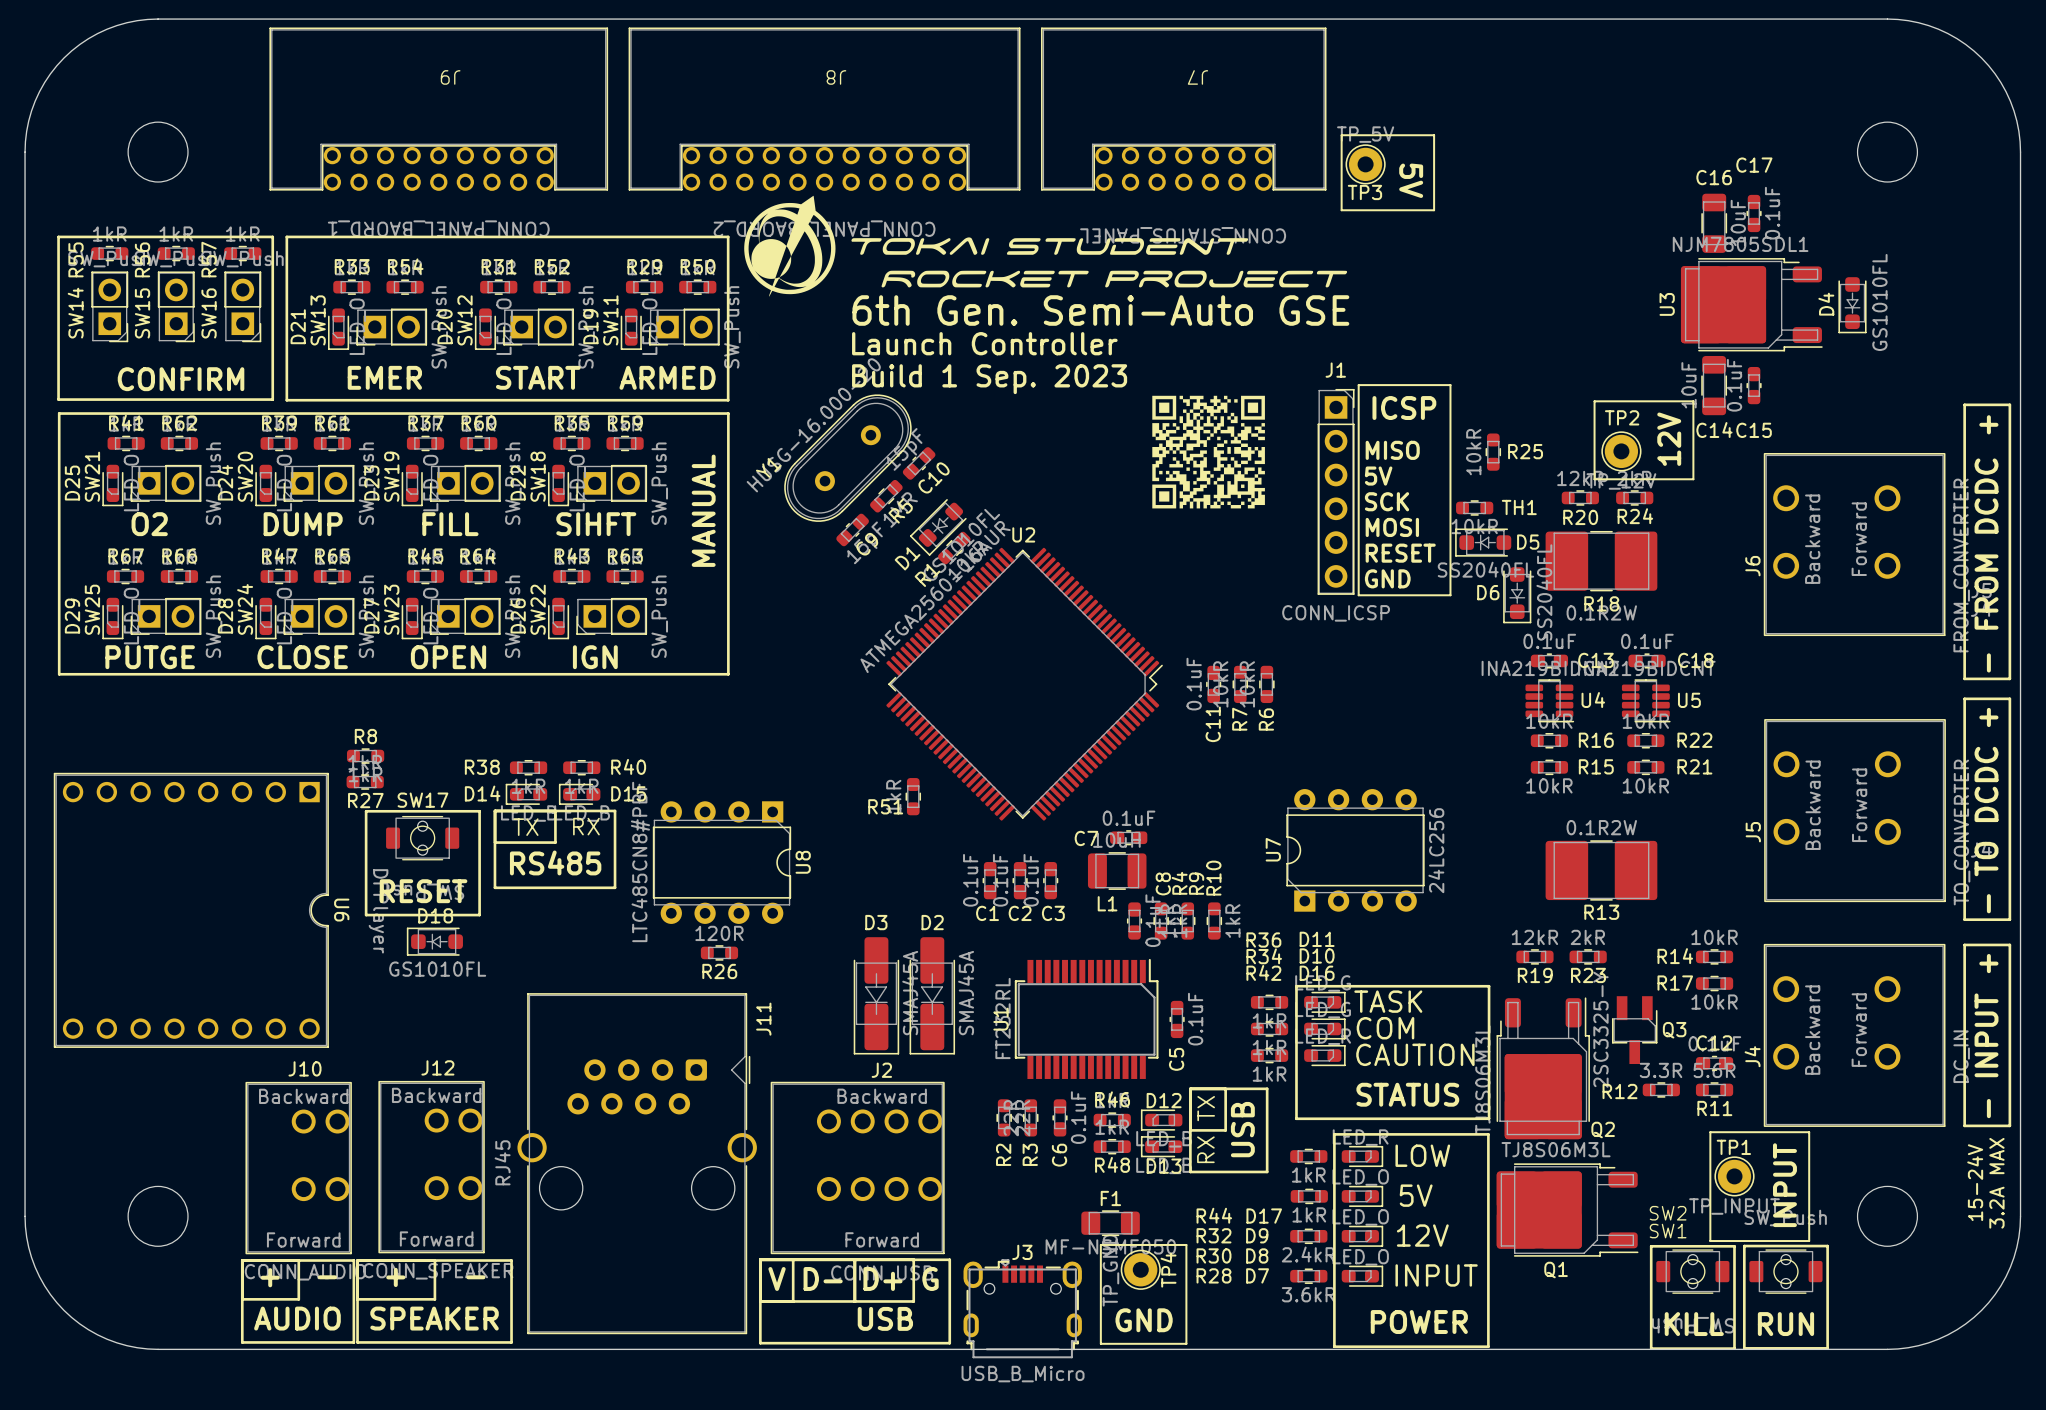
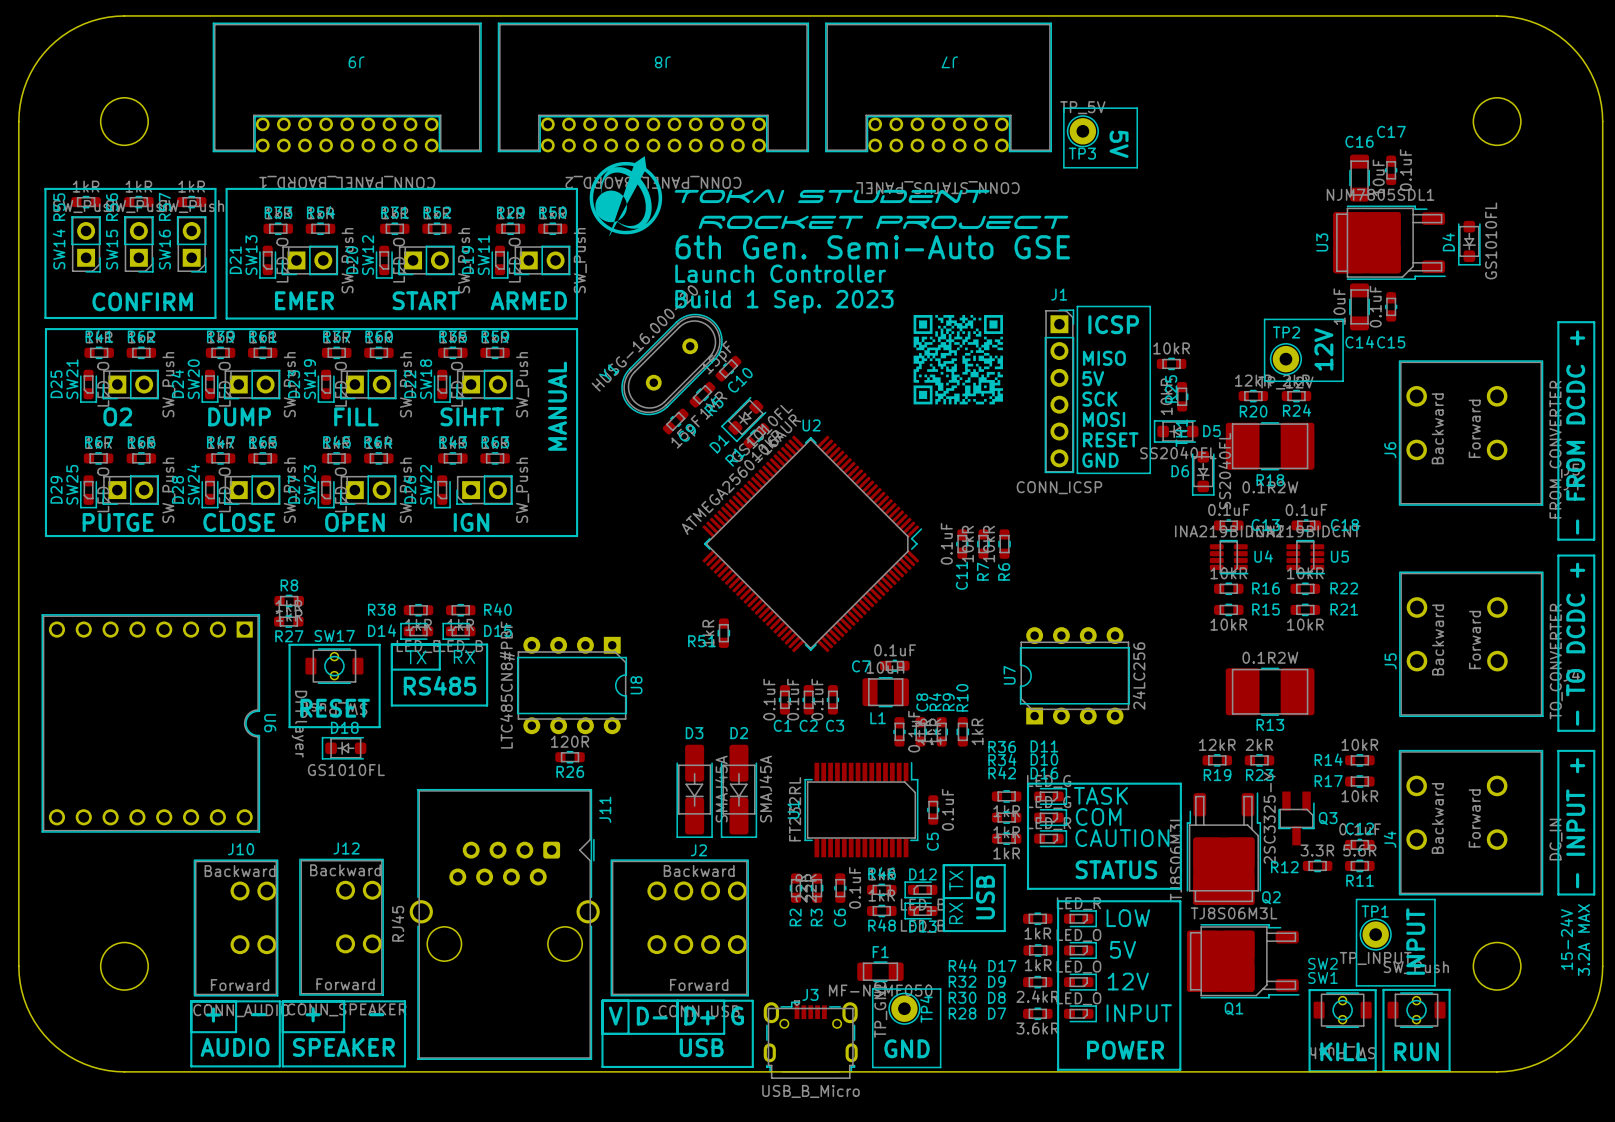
R25 rotation: 0° (1493, 452) -> 90° clockwise (1171, 363)
TH1 rotation: 0° (1474, 507) -> 90° clockwise (1182, 396)

